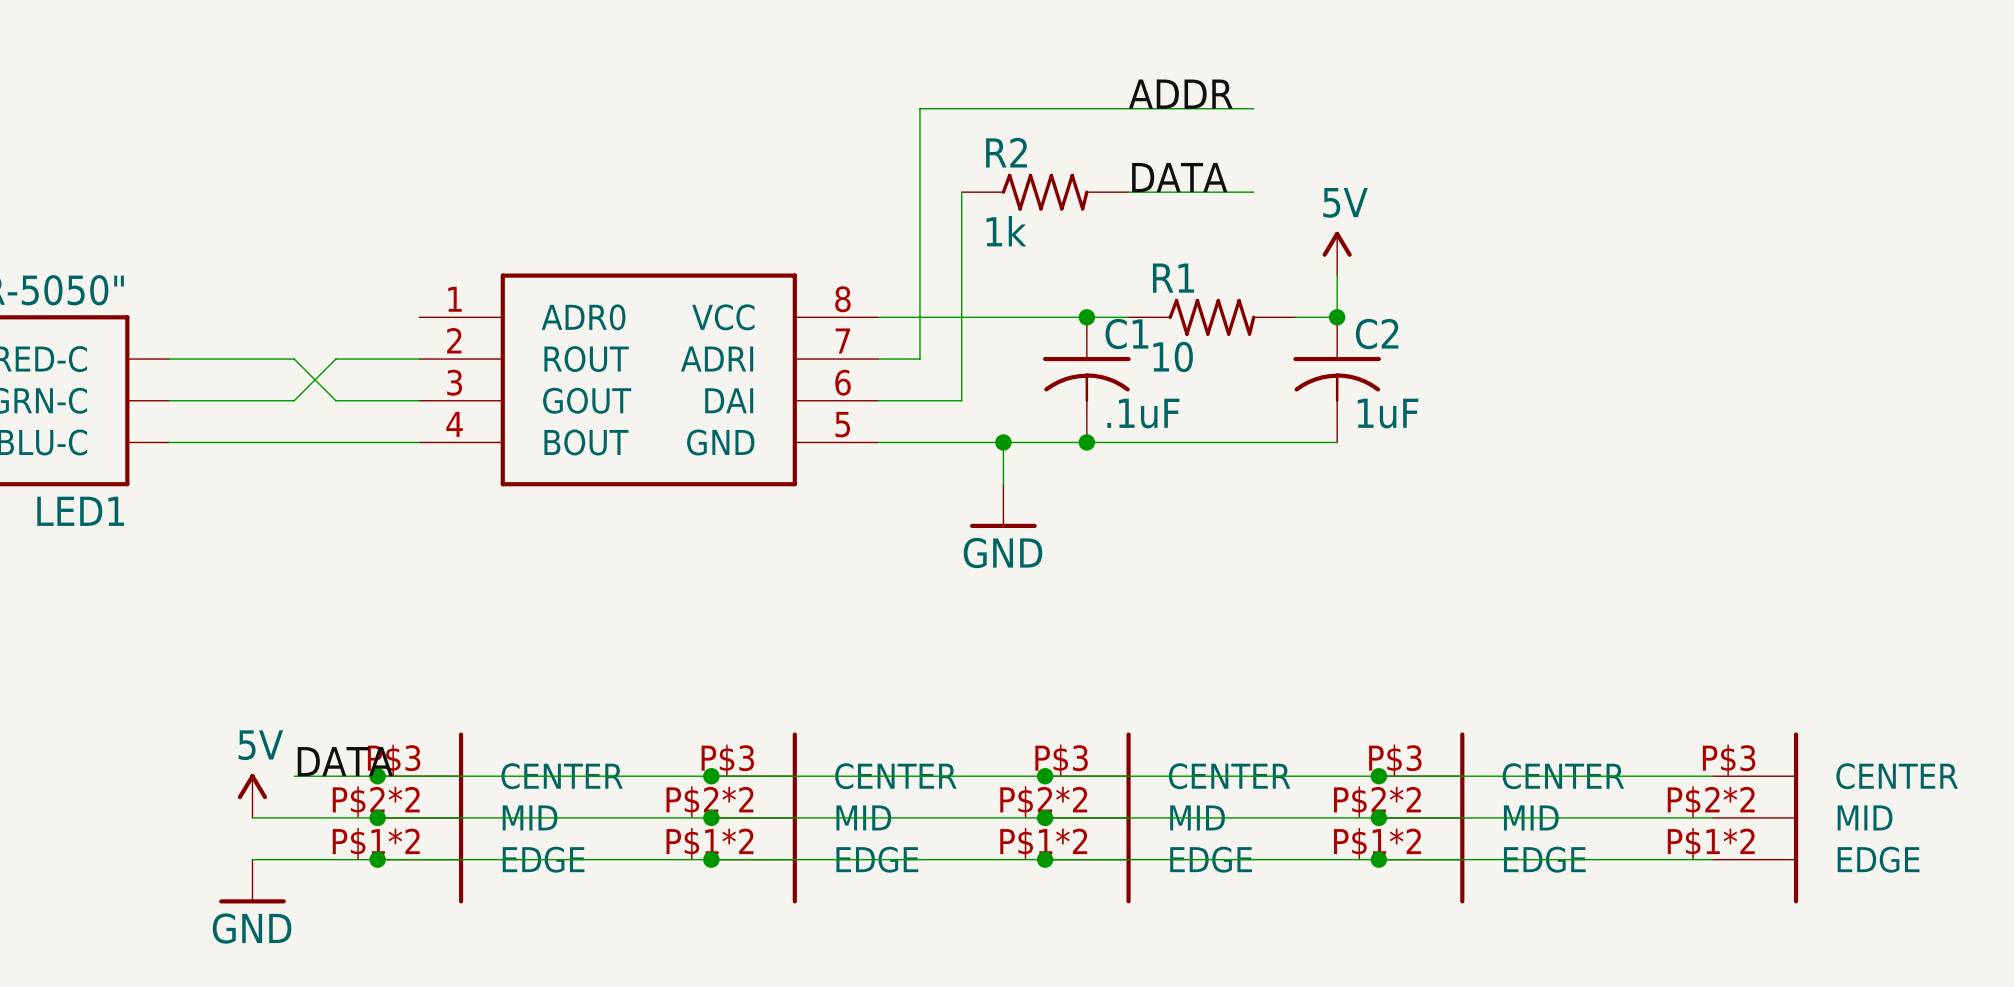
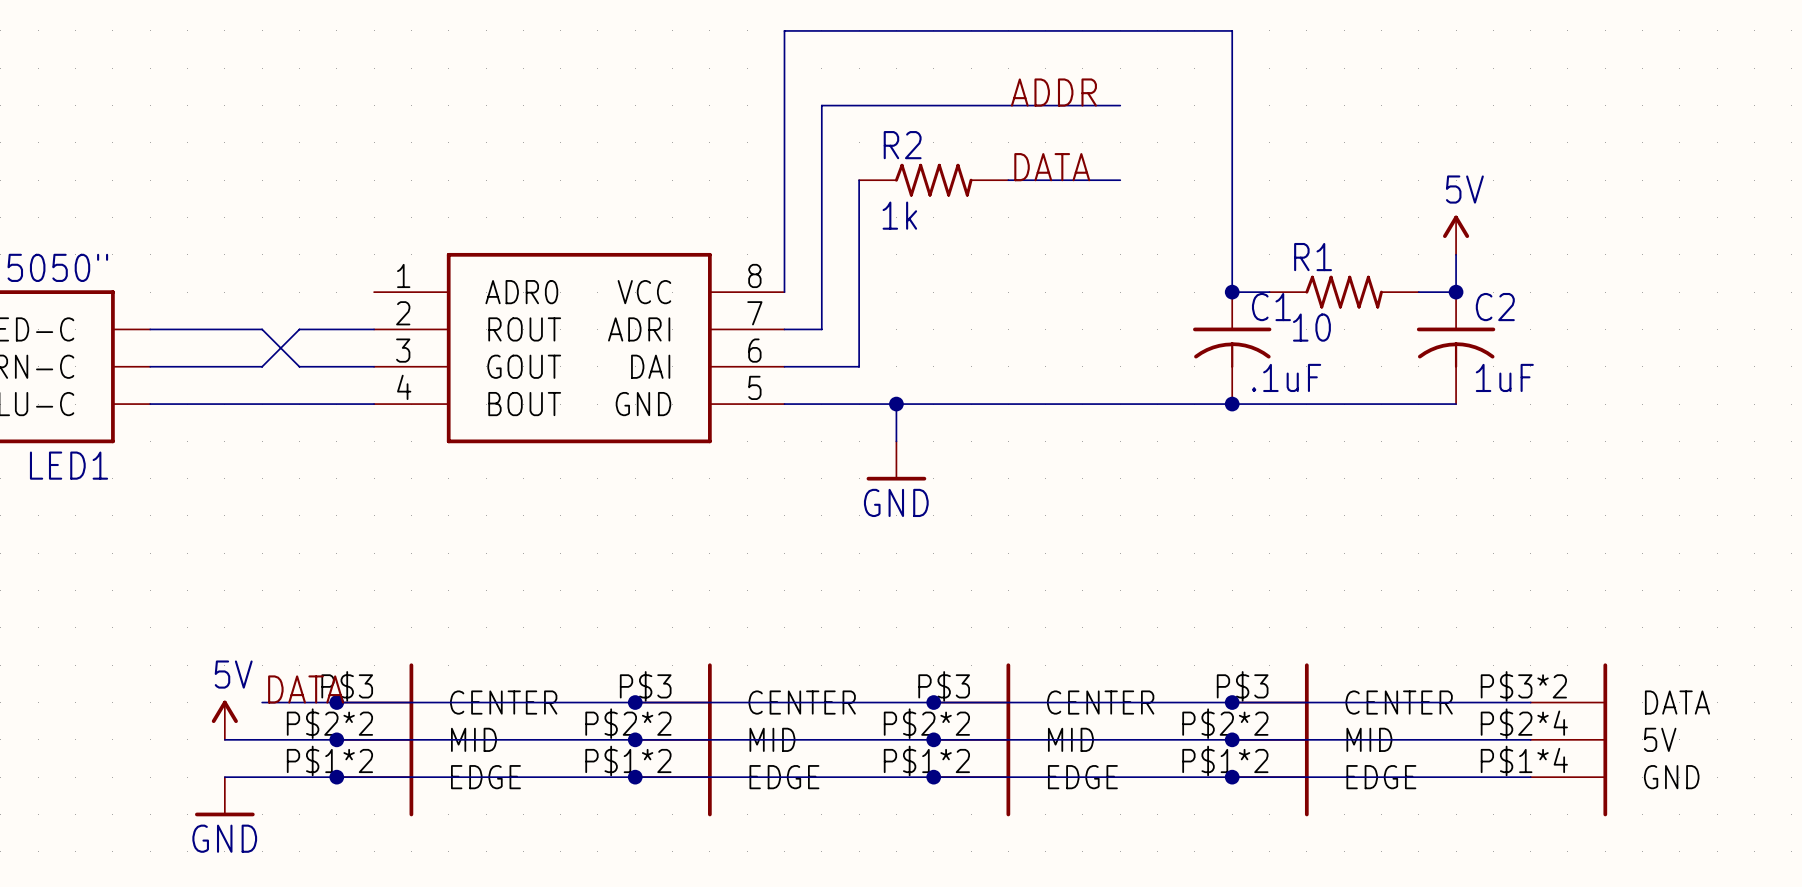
power symbol position: 5V (1337, 253) -> 5V (1456, 235)
wire: (1337, 275) (1337, 317) (1295, 317) -> (1456, 254) (1456, 292) (1418, 292)
wire: (878, 317) (1128, 317) -> (784, 292) (784, 30) (1232, 30) (1232, 292) (1269, 292)
junction: (1086, 317) -> none
R1 position: (1212, 317) -> (1344, 292)
junction position: (1337, 317) -> (1232, 292)
junction: none -> (1456, 292)
C1 position: (1086, 379) -> (1232, 348)
C2 position: (1337, 379) -> (1456, 348)
junction: (1086, 442) -> none
wire: none -> (1194, 404) (1456, 404)
junction: none -> (1232, 404)
part pin number: P$3 (1729, 760) -> P$3*2 (1523, 686)
part pin name: CENTER (1897, 776) -> DATA (1677, 702)
part pin number: P$2*2 (1711, 801) -> P$2*4 (1524, 723)
part pin name: MID (1865, 817) -> 5V (1660, 739)
part pin number: P$1*2 (1711, 843) -> P$1*4 (1524, 760)
part pin name: EDGE (1878, 859) -> GND (1671, 777)

